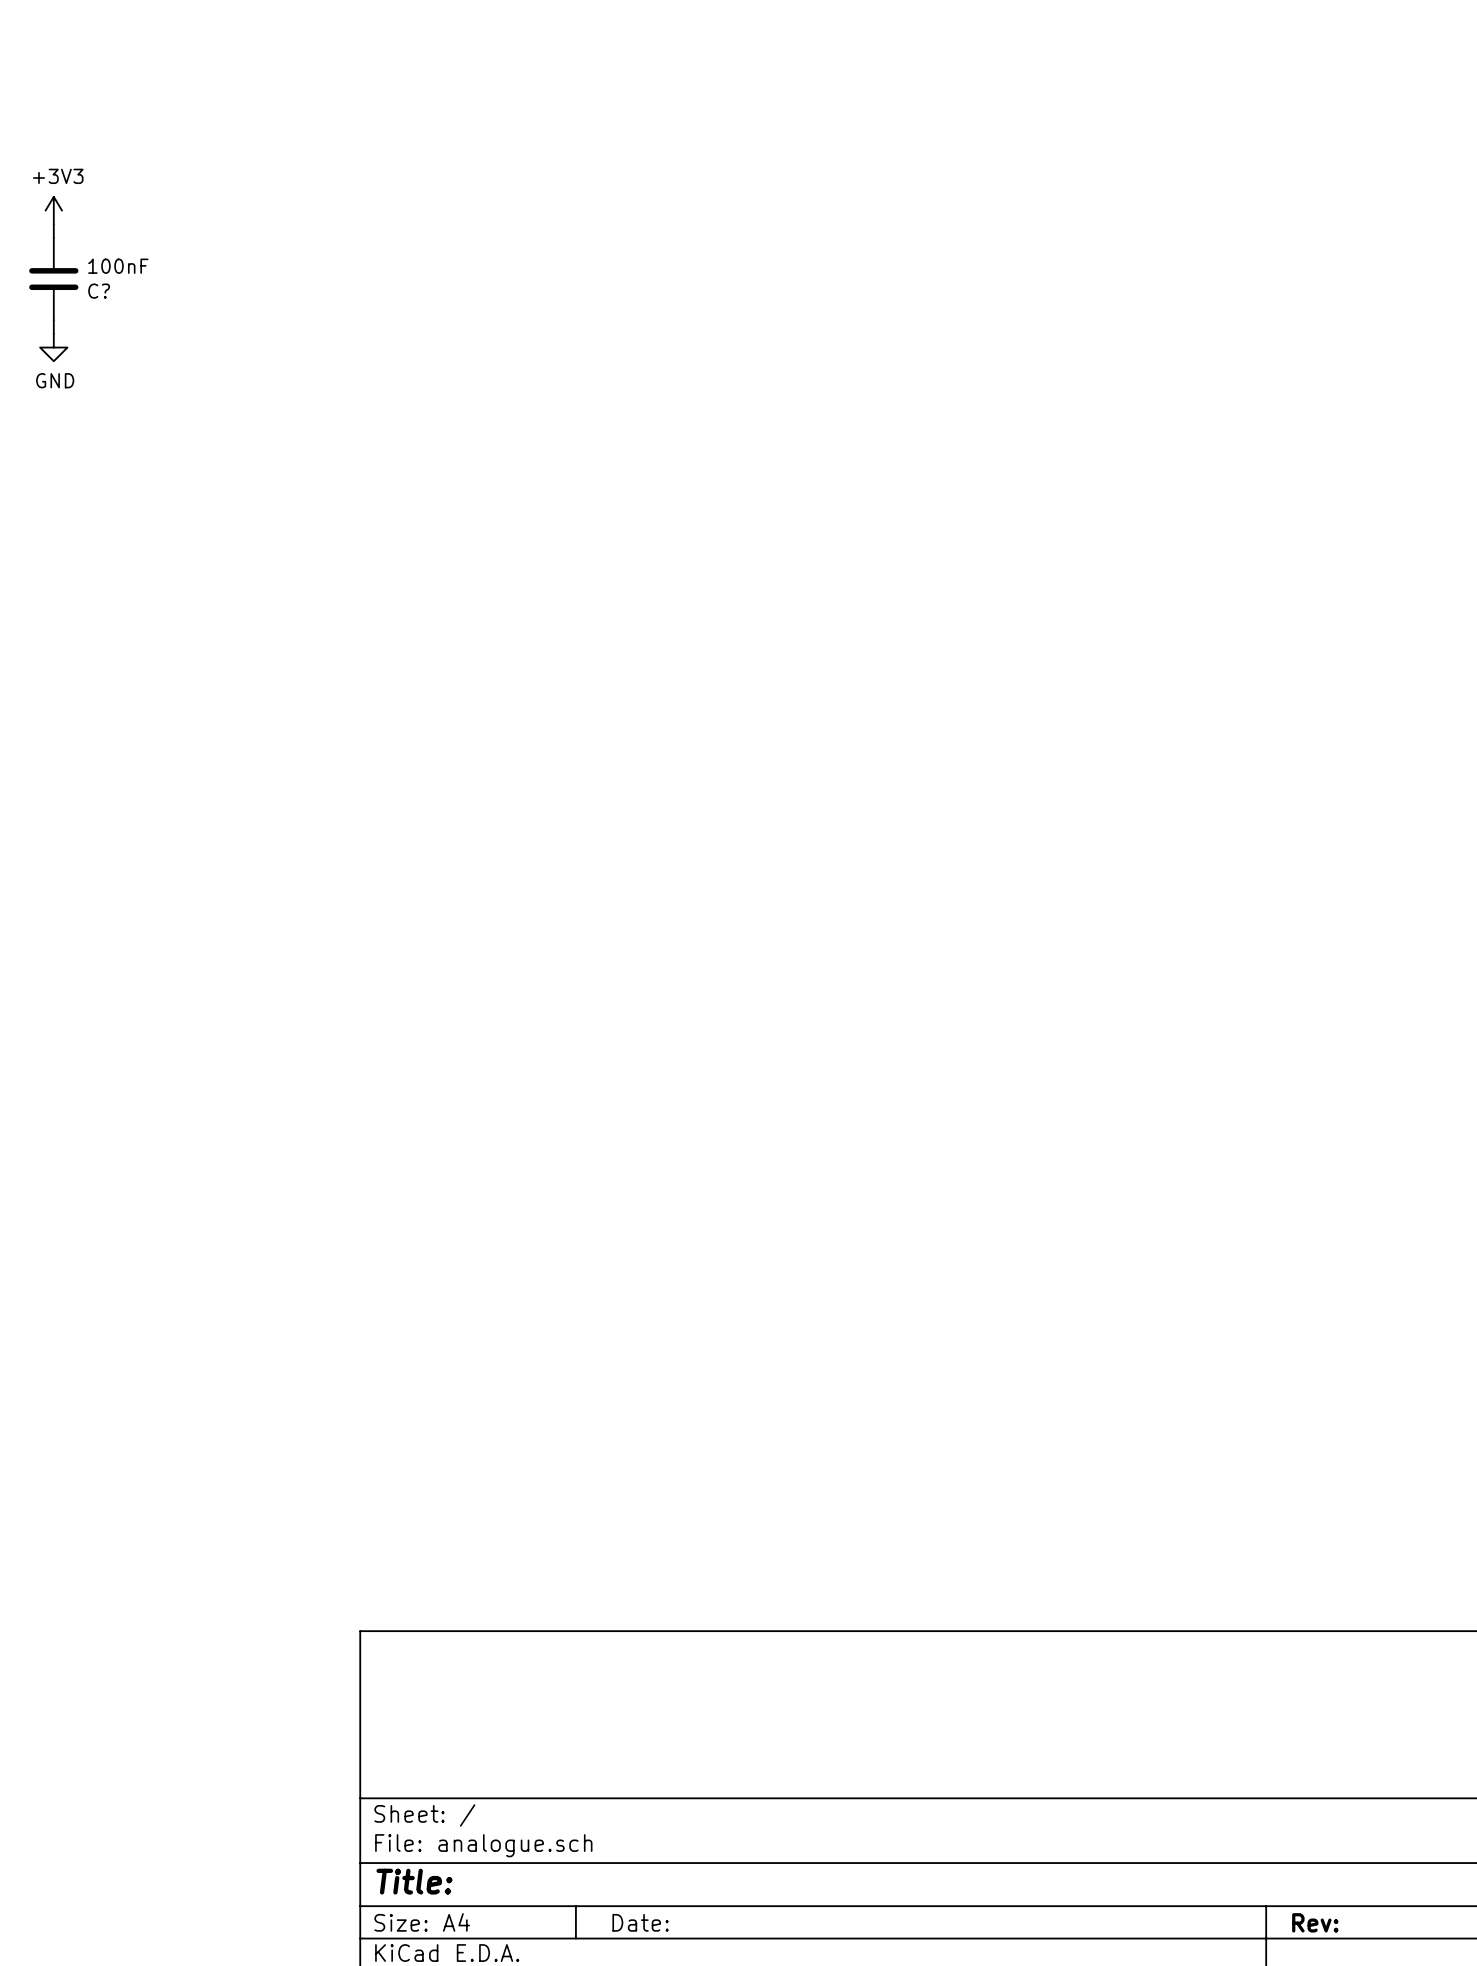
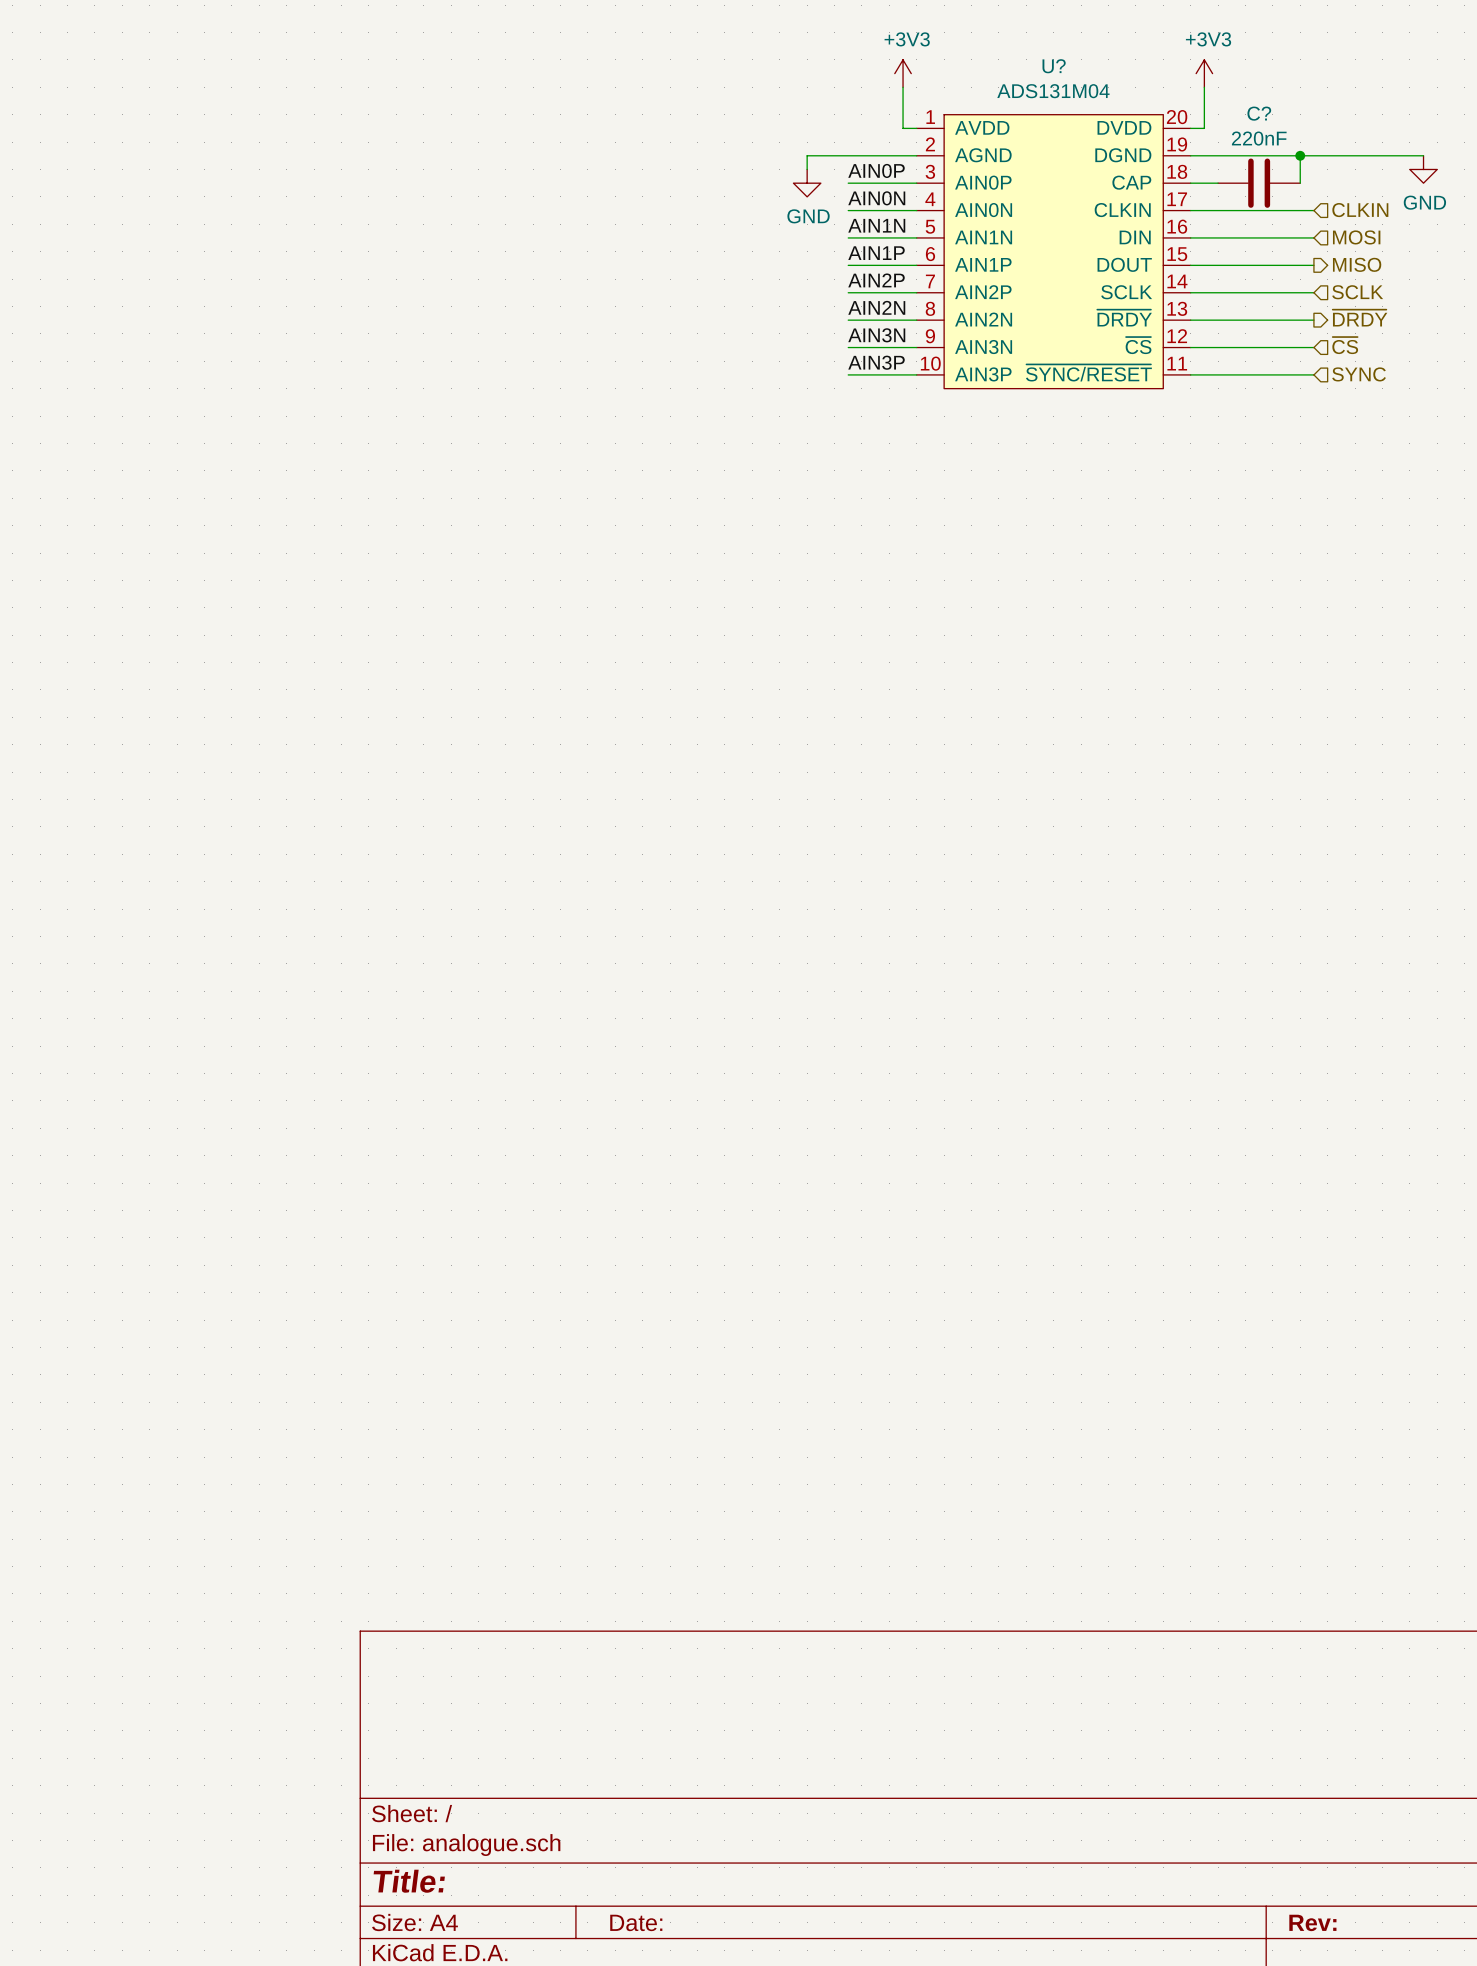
power symbol: none -> +3V3 (903, 73)
power symbol: none -> +3V3 (1204, 73)
wire: none -> (903, 87) (903, 128) (916, 128)
wire: none -> (1204, 87) (1204, 128) (1190, 128)
wire: none -> (916, 155) (807, 155) (807, 169)
wire: none -> (1190, 155) (1423, 155)
wire: none -> (1300, 155) (1300, 183)
junction: none -> (1300, 155)
power symbol: none -> GND (1423, 169)
label: none -> AIN0P (876, 170)
power symbol: none -> GND (807, 183)
wire: none -> (848, 183) (916, 183)
wire: none -> (1190, 183) (1218, 183)
C?: none -> 220nF (1259, 183)
label: none -> AIN0N (876, 198)
power symbol: +3V3 (53, 210) -> none
wire: none -> (848, 210) (916, 210)
wire: none -> (1190, 210) (1313, 210)
hierarchical label: none -> CLKIN (1360, 210)
wire: (53, 224) (53, 237) -> none
label: none -> AIN1N (876, 225)
wire: none -> (848, 237) (916, 237)
wire: none -> (1190, 237) (1313, 237)
hierarchical label: none -> MOSI (1356, 237)
U?: none -> ADS131M04 (1053, 251)
label: none -> AIN1P (876, 253)
hierarchical label: none -> MISO (1357, 264)
wire: none -> (848, 265) (916, 265)
wire: none -> (1190, 265) (1313, 265)
C?: 100nF (53, 279) -> none
label: none -> AIN2P (876, 280)
wire: none -> (848, 292) (916, 292)
wire: none -> (1190, 292) (1313, 292)
hierarchical label: none -> SCLK (1357, 292)
label: none -> AIN2N (876, 307)
hierarchical label: none -> ~{DRDY} (1360, 318)
wire: (53, 320) (53, 333) -> none
wire: none -> (848, 320) (916, 320)
wire: none -> (1190, 320) (1313, 320)
label: none -> AIN3N (876, 335)
hierarchical label: none -> ~{CS} (1345, 345)
power symbol: GND (53, 347) -> none
wire: none -> (848, 347) (916, 347)
wire: none -> (1190, 347) (1313, 347)
label: none -> AIN3P (876, 362)
wire: none -> (848, 374) (916, 374)
wire: none -> (1190, 374) (1313, 374)
hierarchical label: none -> SYNC (1359, 374)

